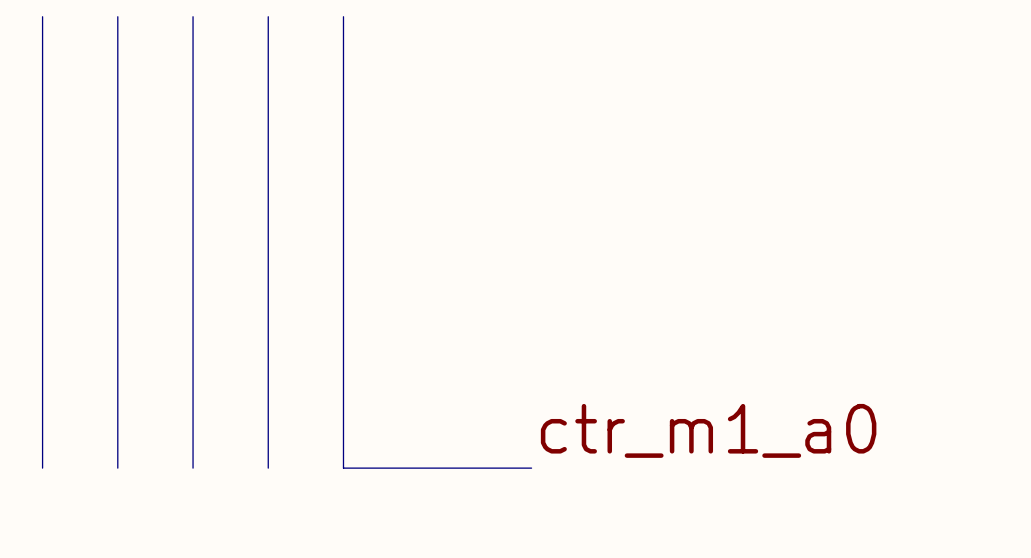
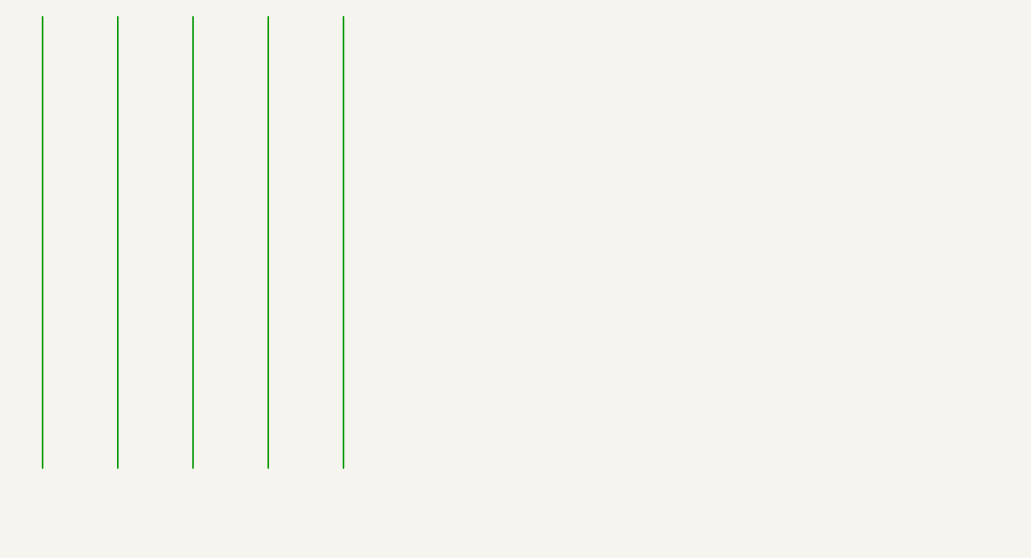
label: ctr_m1_a0 (708, 430) -> none
wire: (343, 468) (531, 468) -> none

